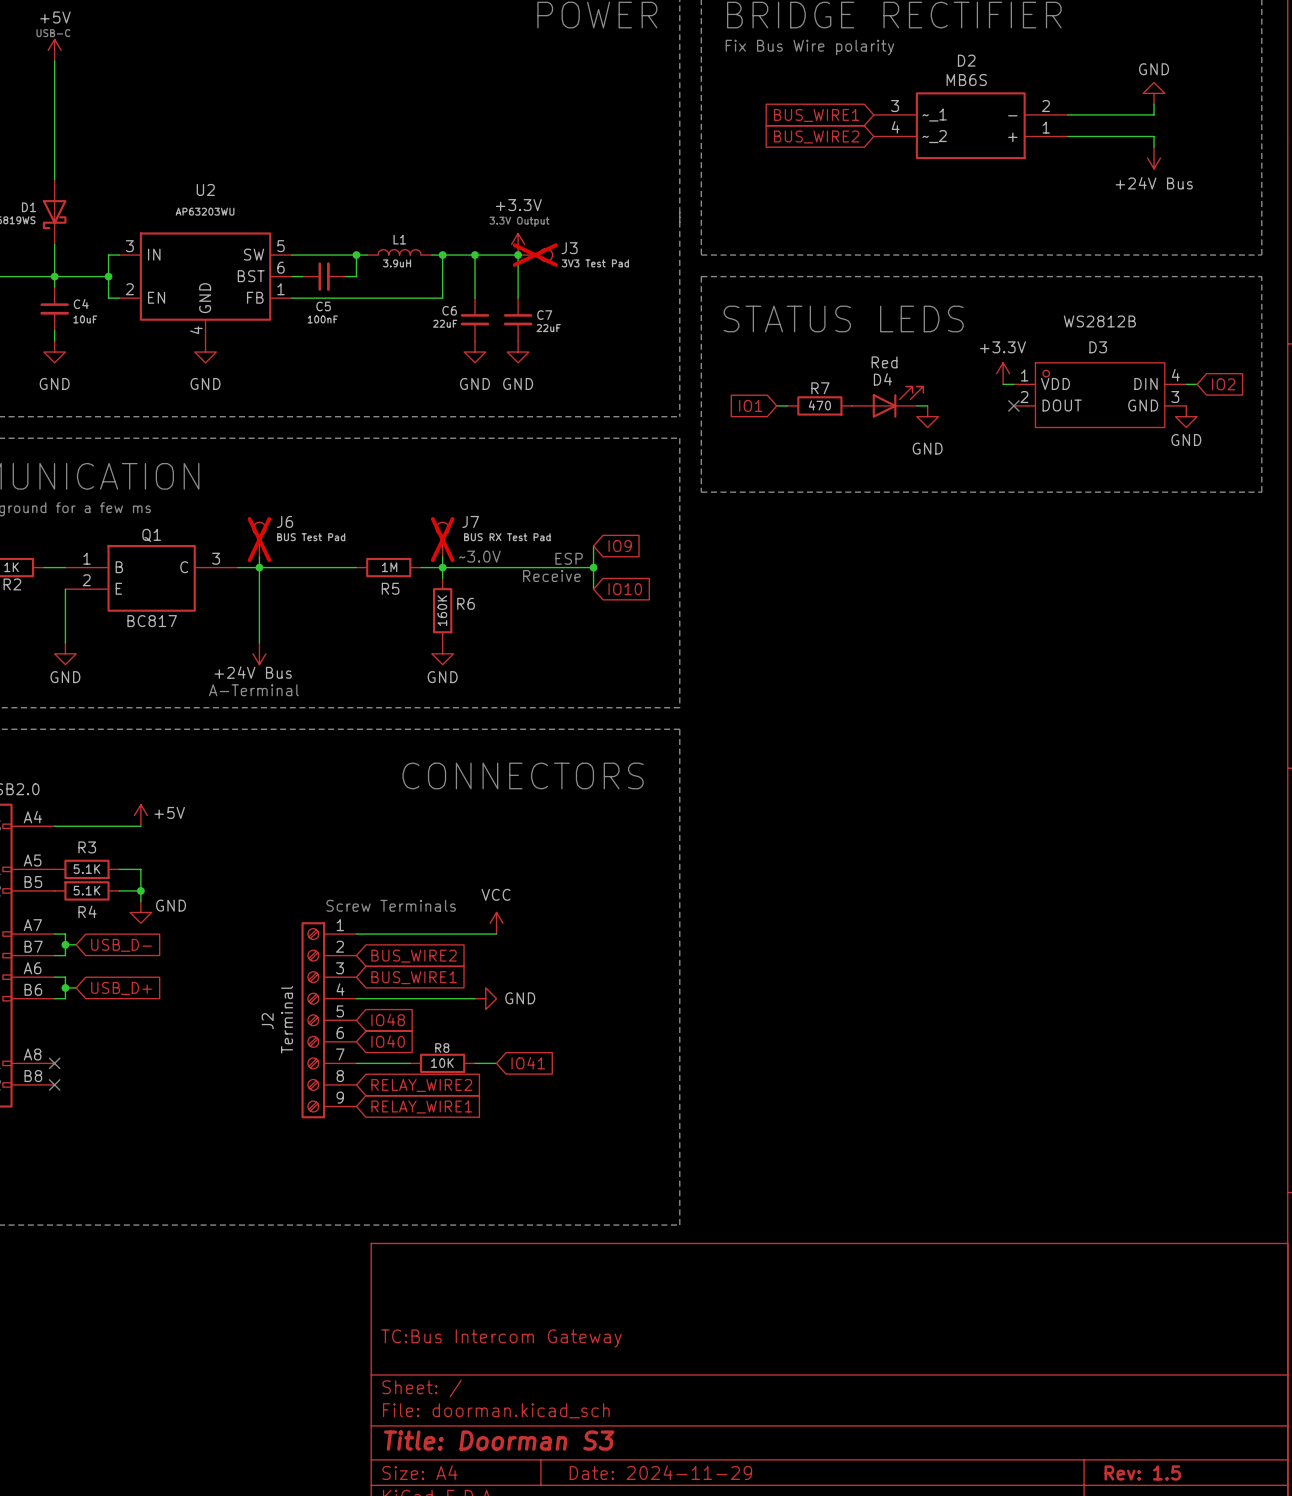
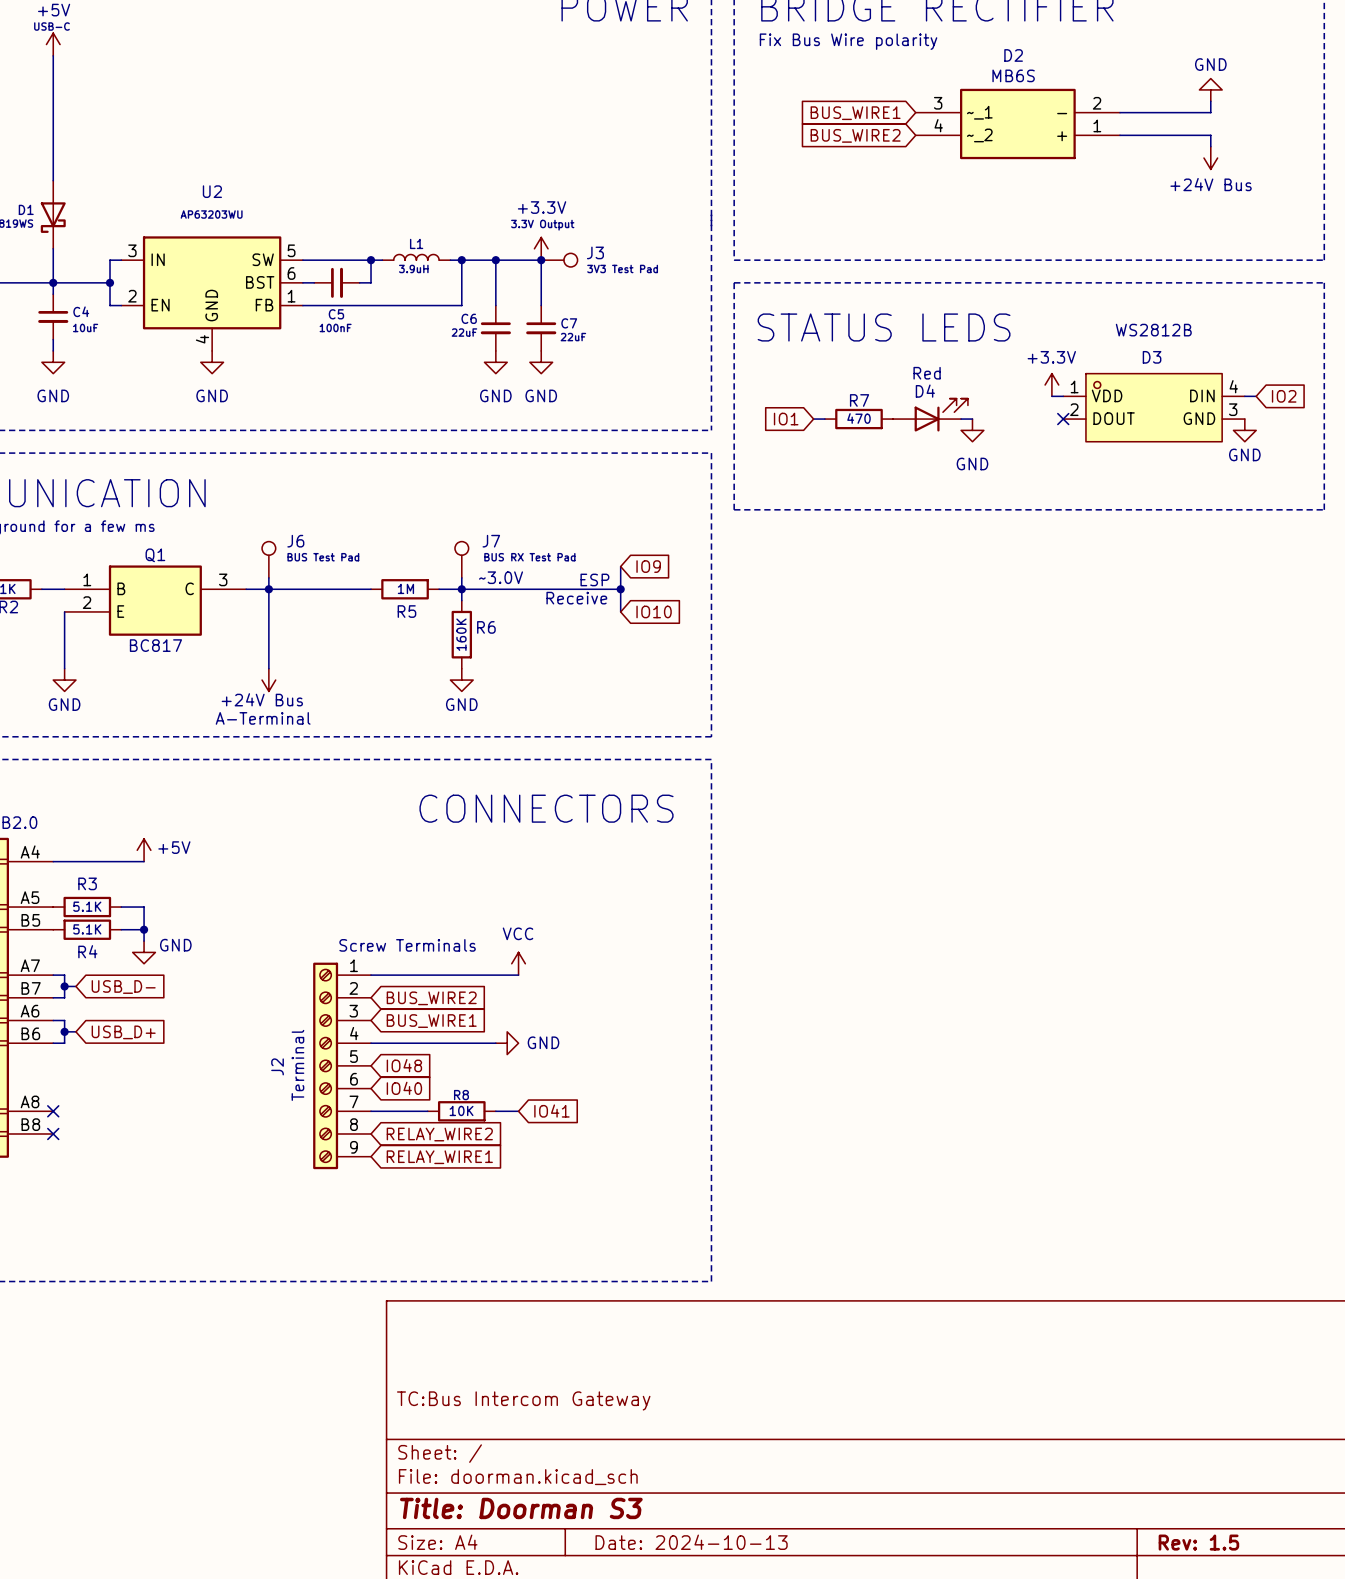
J3 do-not-place cross: (535, 255) -> none
J6 do-not-place cross: (259, 539) -> none
J7 do-not-place cross: (442, 539) -> none
title block: Date: 2024-11-29 (660, 1472) -> Date: 2024-10-13 (691, 1542)

